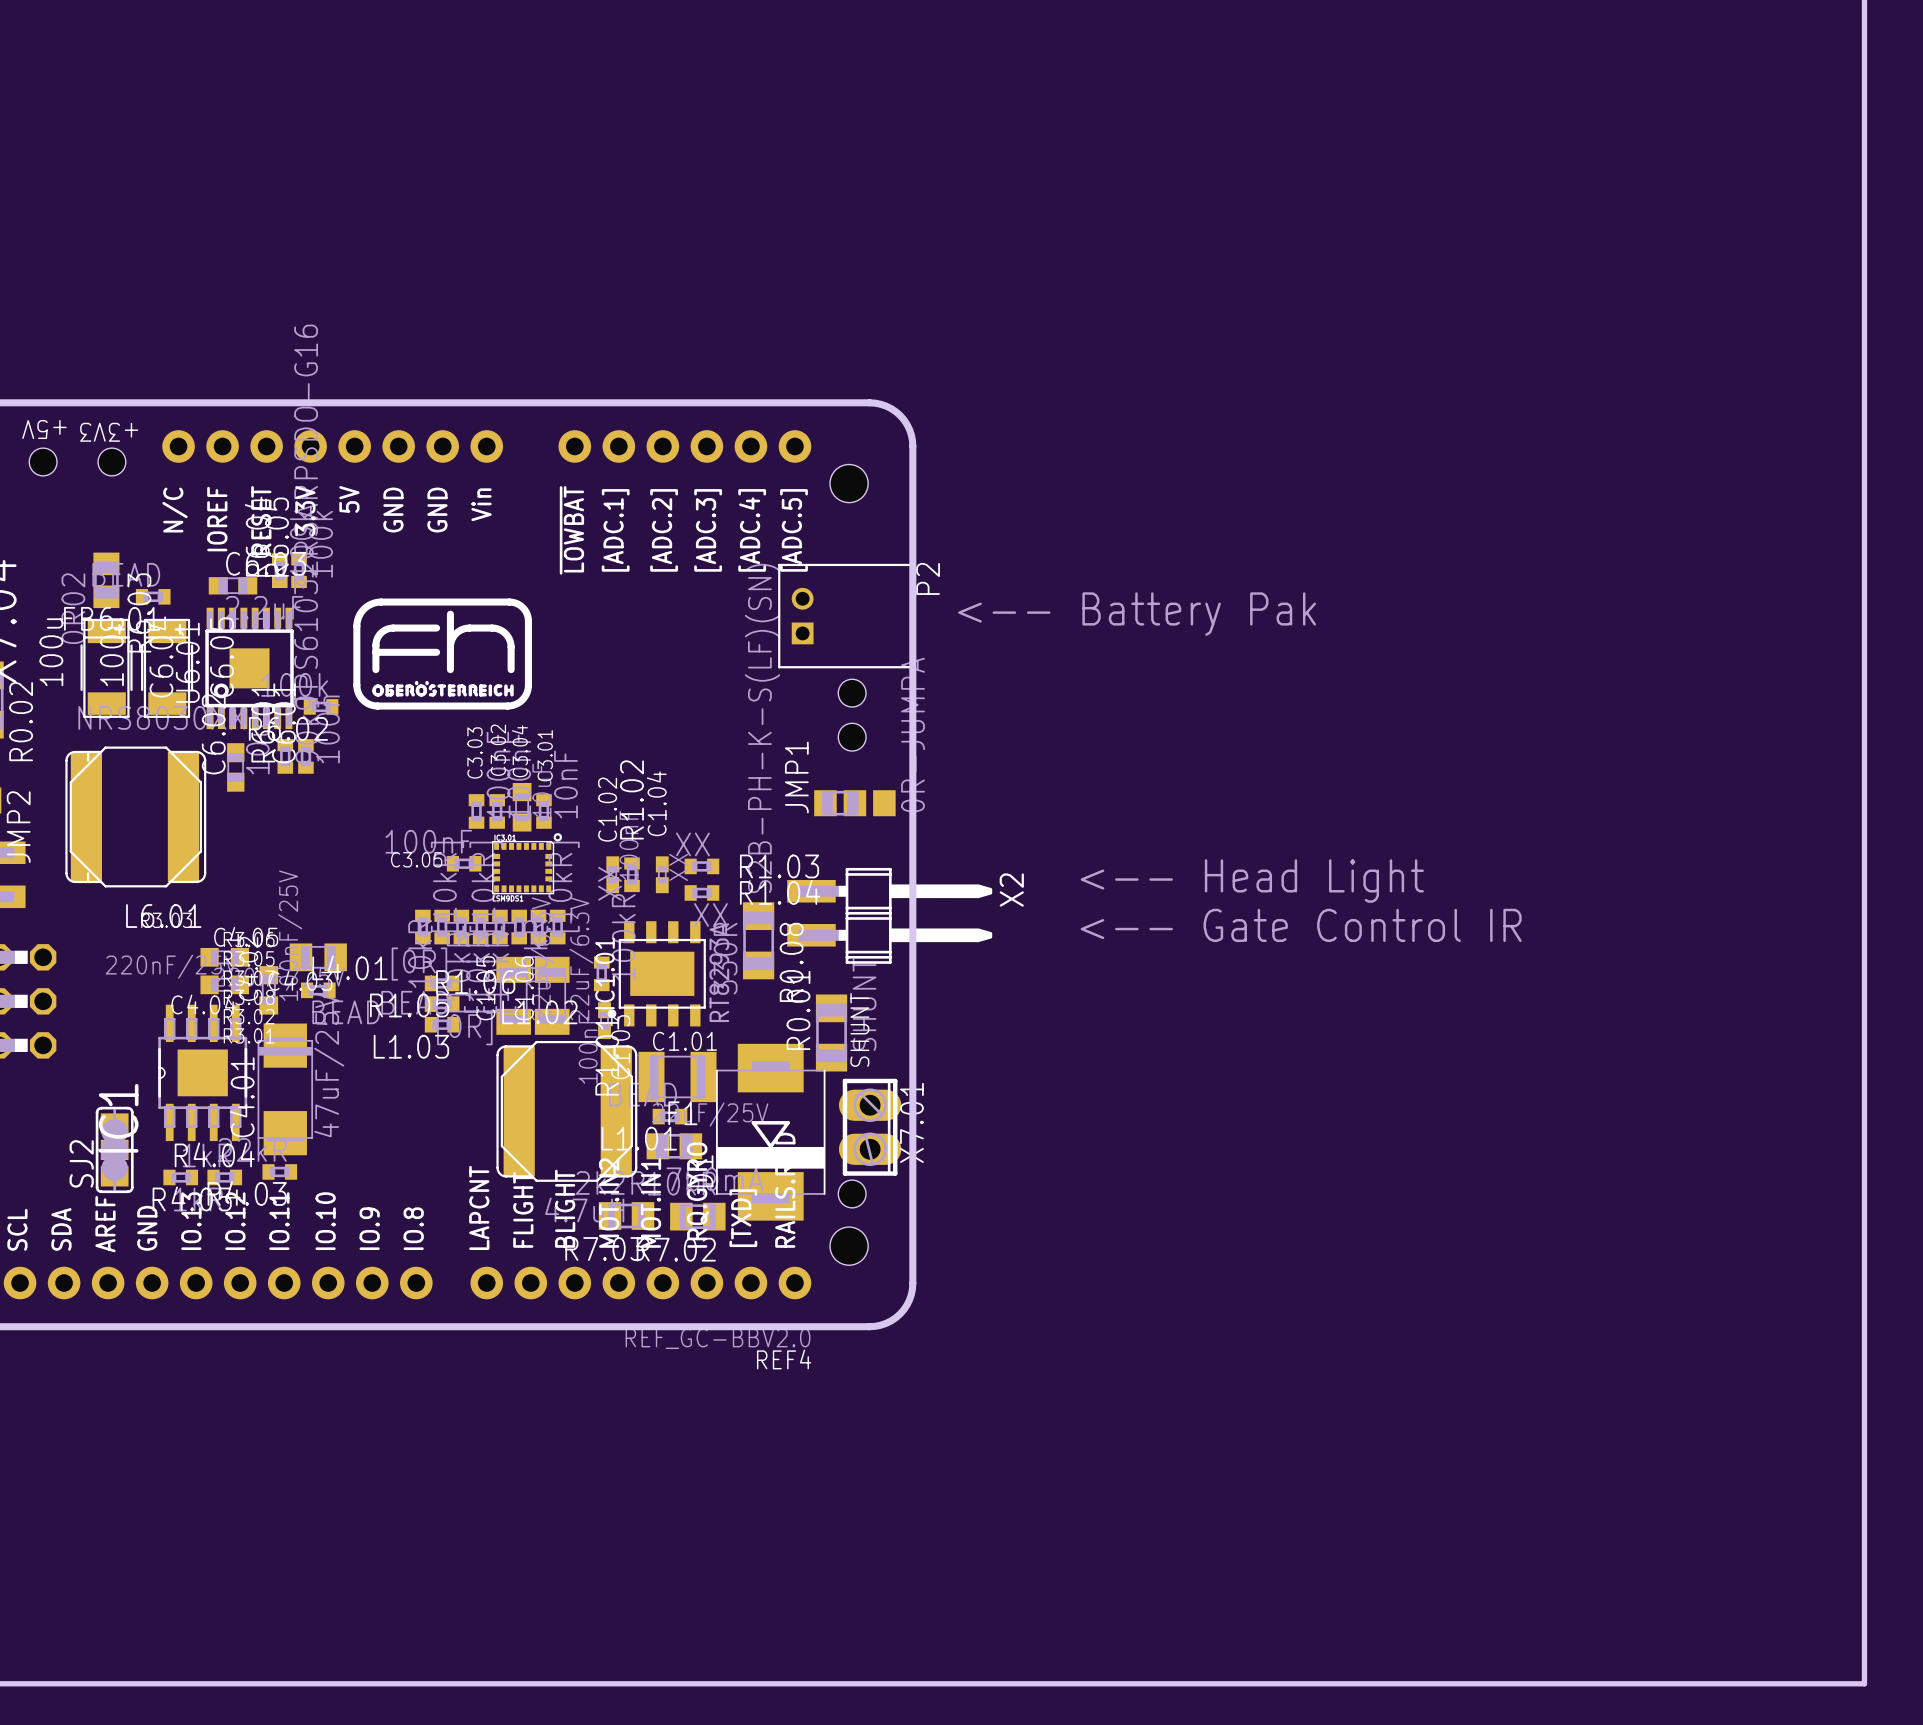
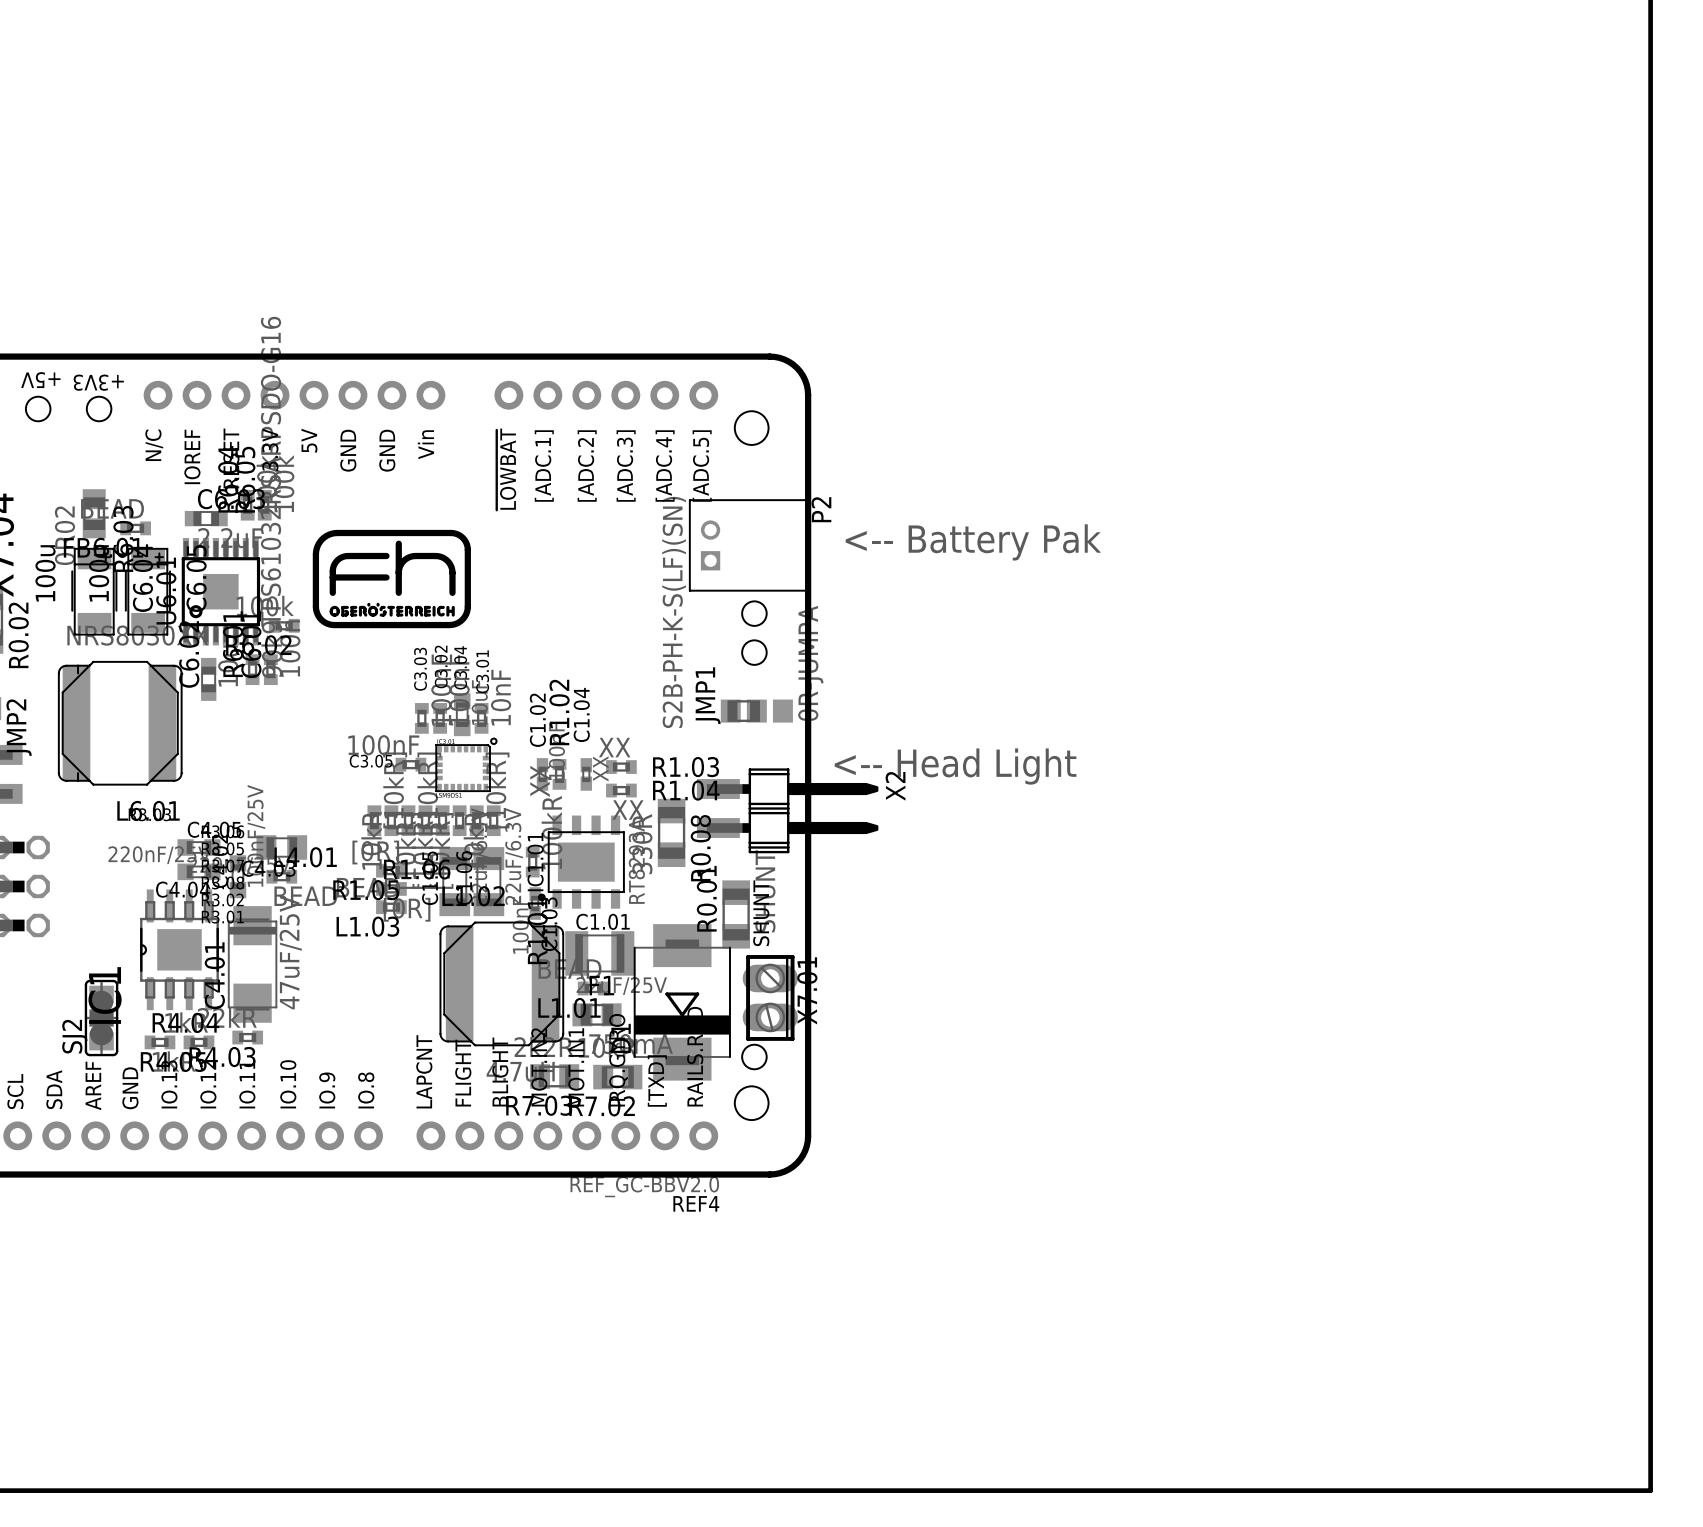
text position: <-- Head Light (1252, 881) -> <-- Head Light (955, 766)
text: <-- Gate Control IR (1301, 925) -> none

